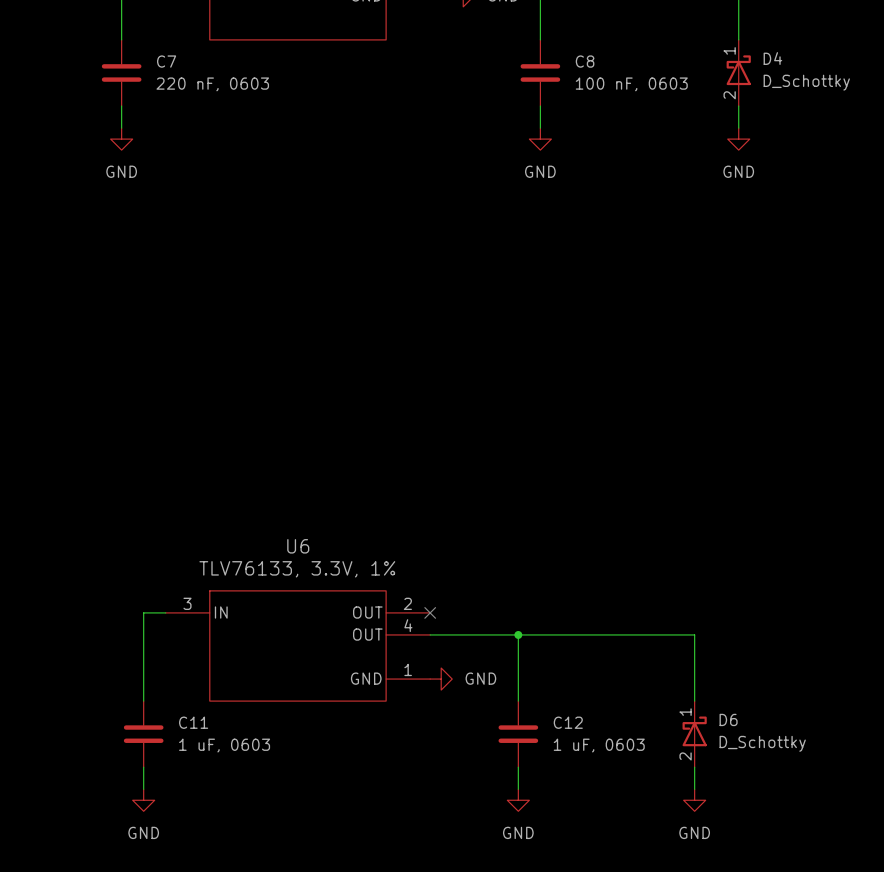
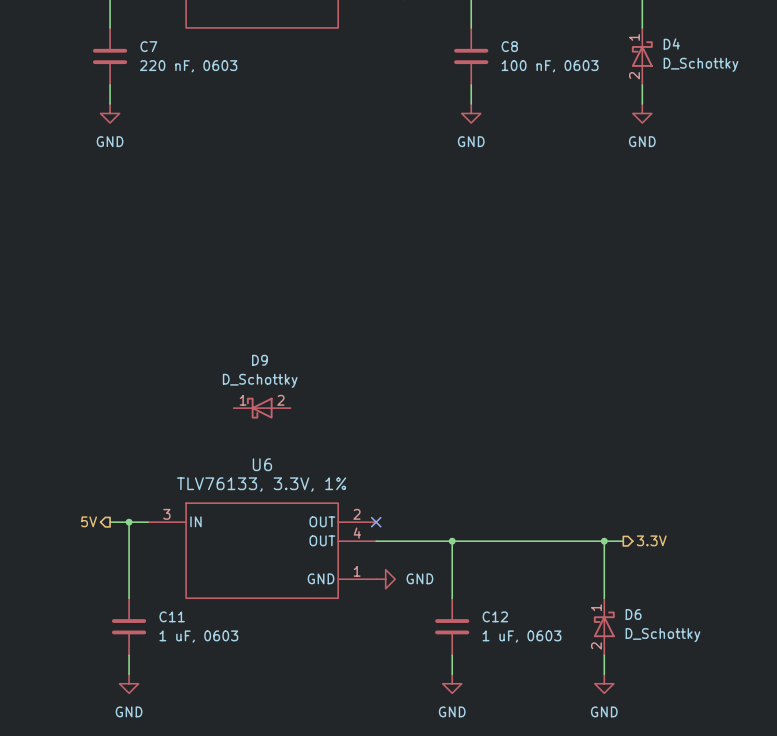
D9: none -> D_Schottky (262, 408)
hierarchical label: none -> 5V (89, 521)
wire: none -> (110, 522) (129, 522)
junction: none -> (129, 522)
wire: none -> (604, 541) (623, 541)
junction: none -> (604, 541)
hierarchical label: none -> 3.3V (651, 540)

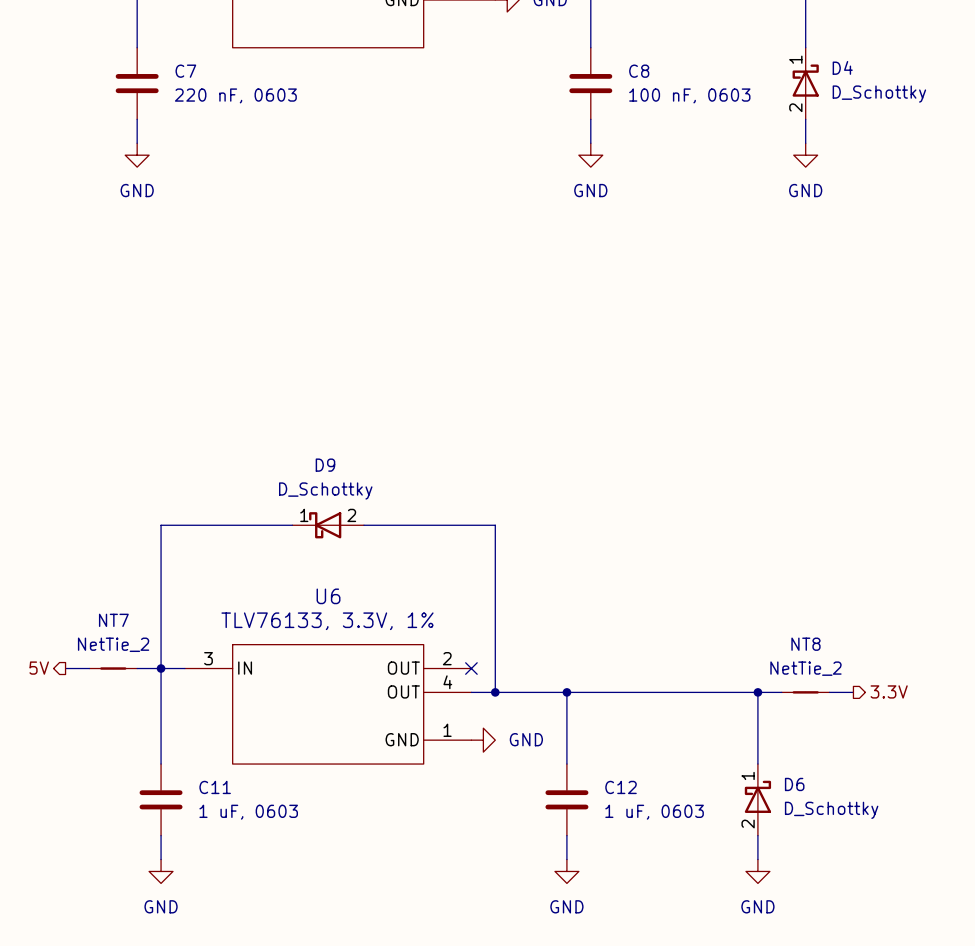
wire: none -> (292, 525) (161, 525) (161, 668)
wire: none -> (363, 525) (495, 525) (495, 692)
hierarchical label position: 5V (89, 521) -> 5V (39, 668)
wire: none -> (65, 668) (89, 668)
NT7: none -> NetTie_2 (113, 668)
hierarchical label position: 3.3V (651, 540) -> 3.3V (889, 691)
junction: none -> (495, 692)
NT8: none -> NetTie_2 (805, 692)
wire: none -> (829, 692) (853, 692)

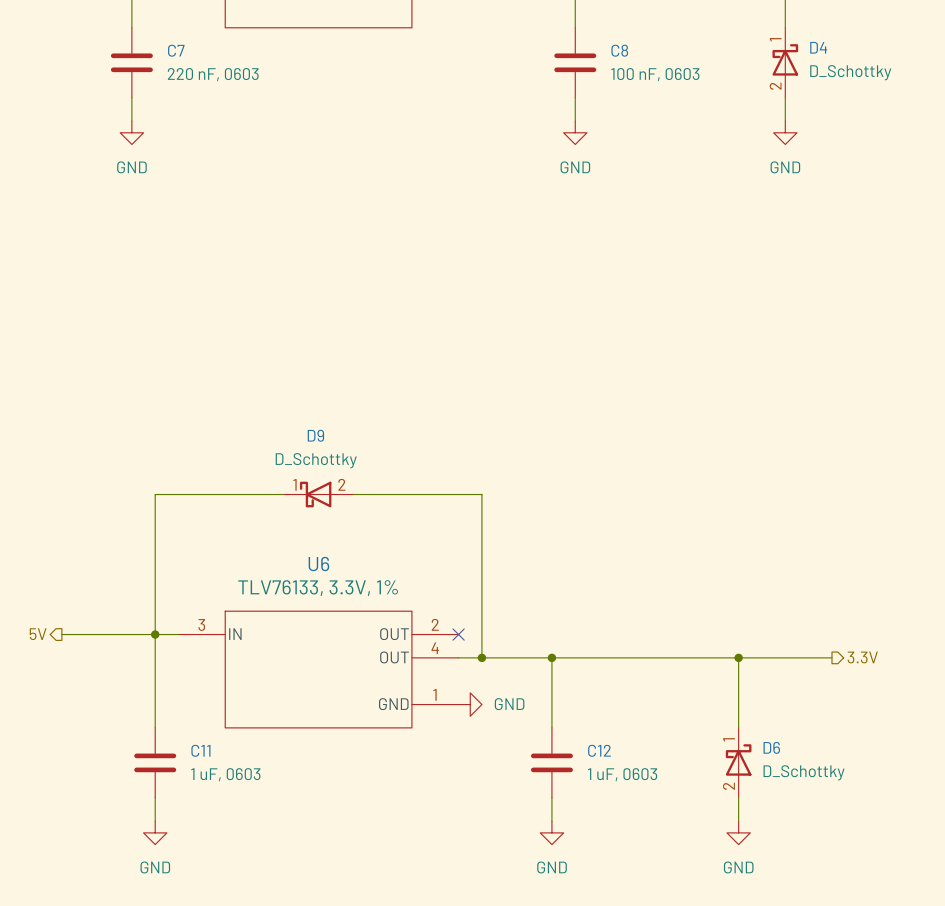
NT7: NetTie_2 (113, 668) -> none
NT8: NetTie_2 (805, 692) -> none

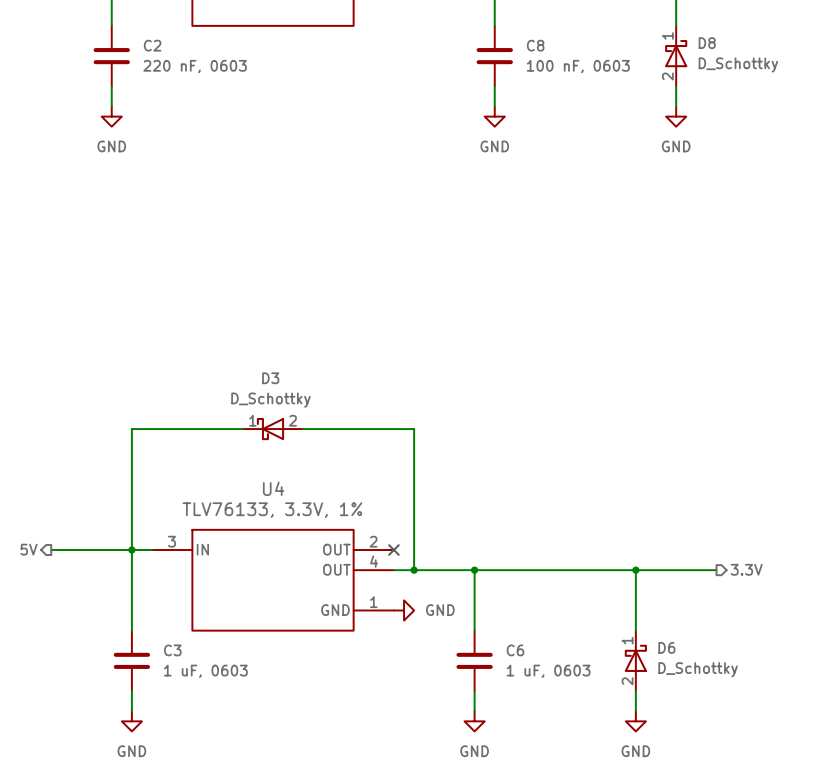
D4 name: D4 (818, 47) -> D8 (707, 43)
C7 name: C7 (176, 50) -> C2 (152, 45)
D9 name: D9 (315, 435) -> D3 (270, 378)
U6 name: U6 (318, 564) -> U4 (273, 488)
C11 name: C11 (200, 750) -> C3 (172, 650)
C12 name: C12 (599, 750) -> C6 (515, 650)

